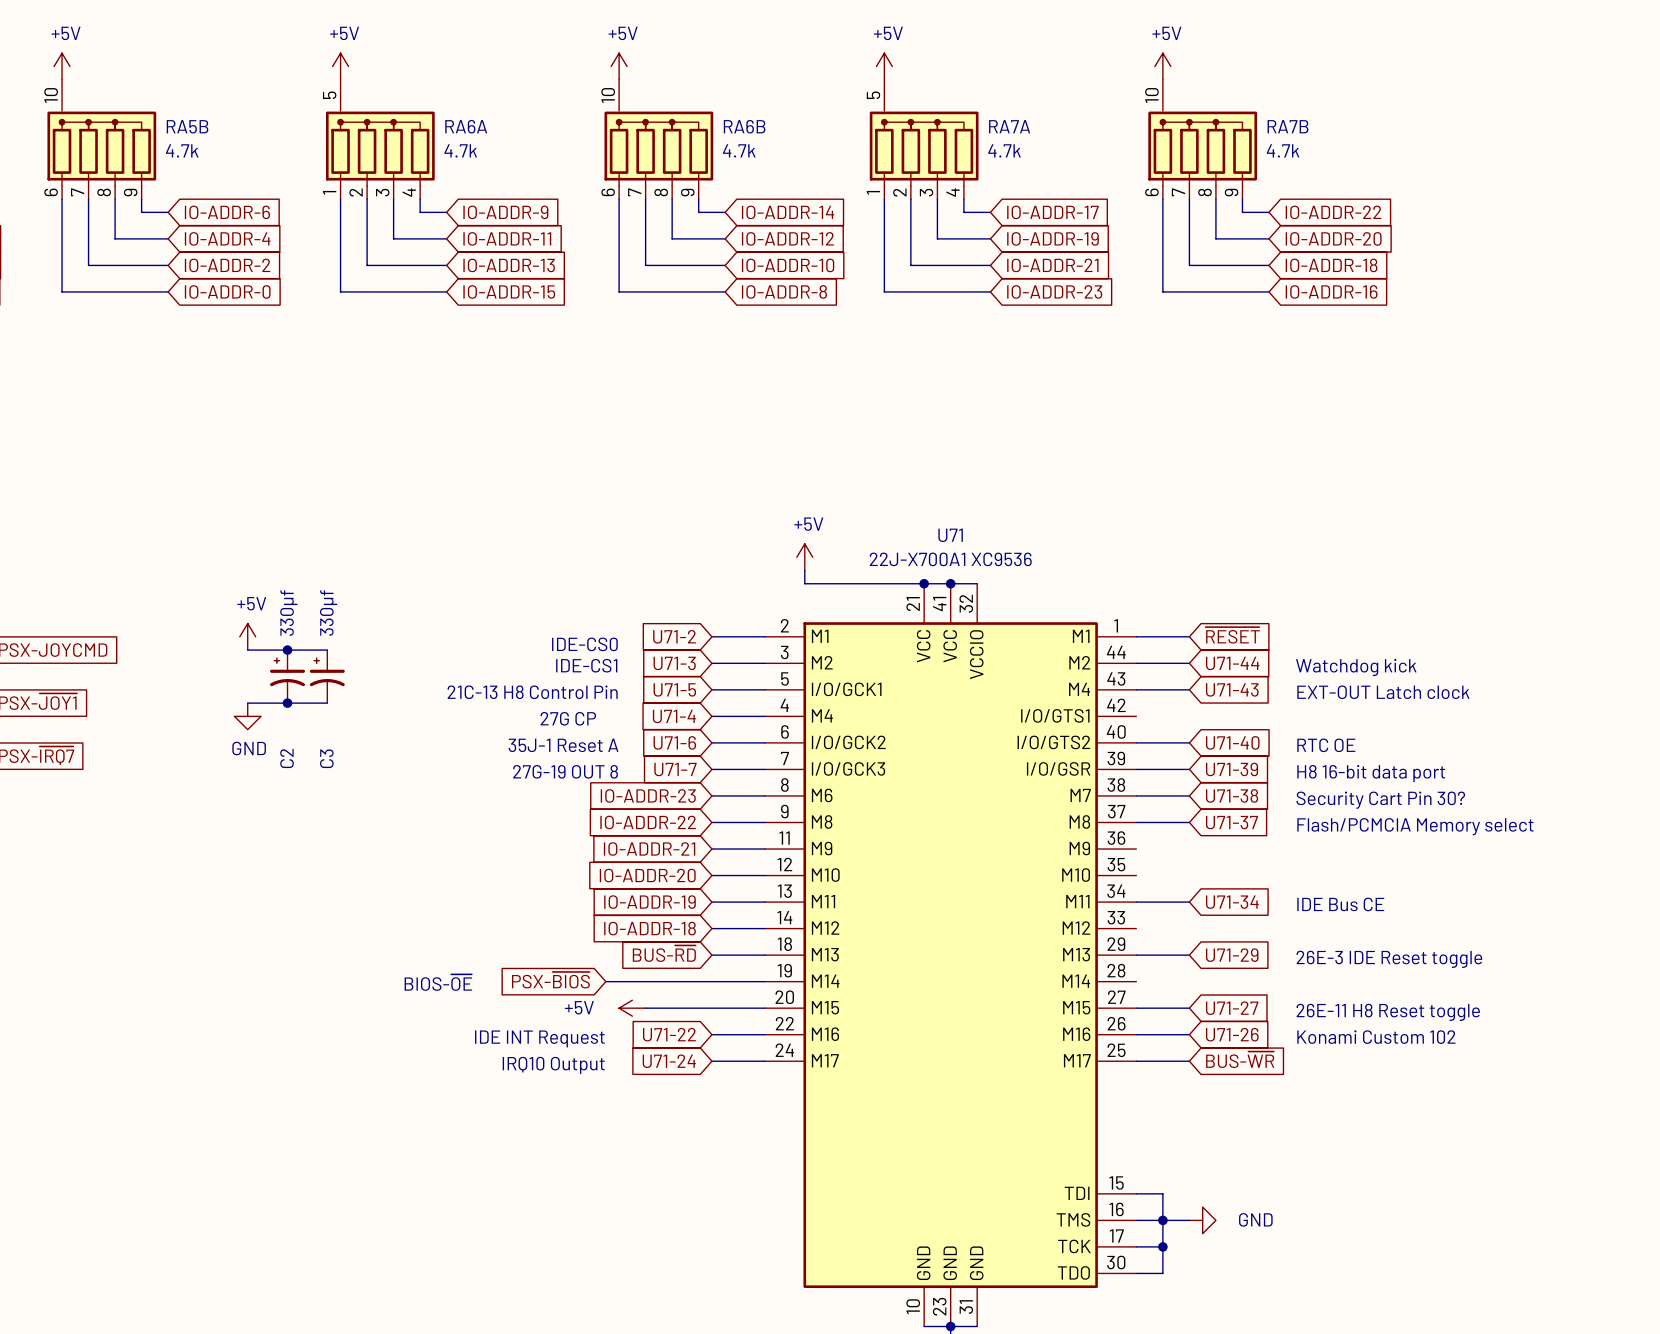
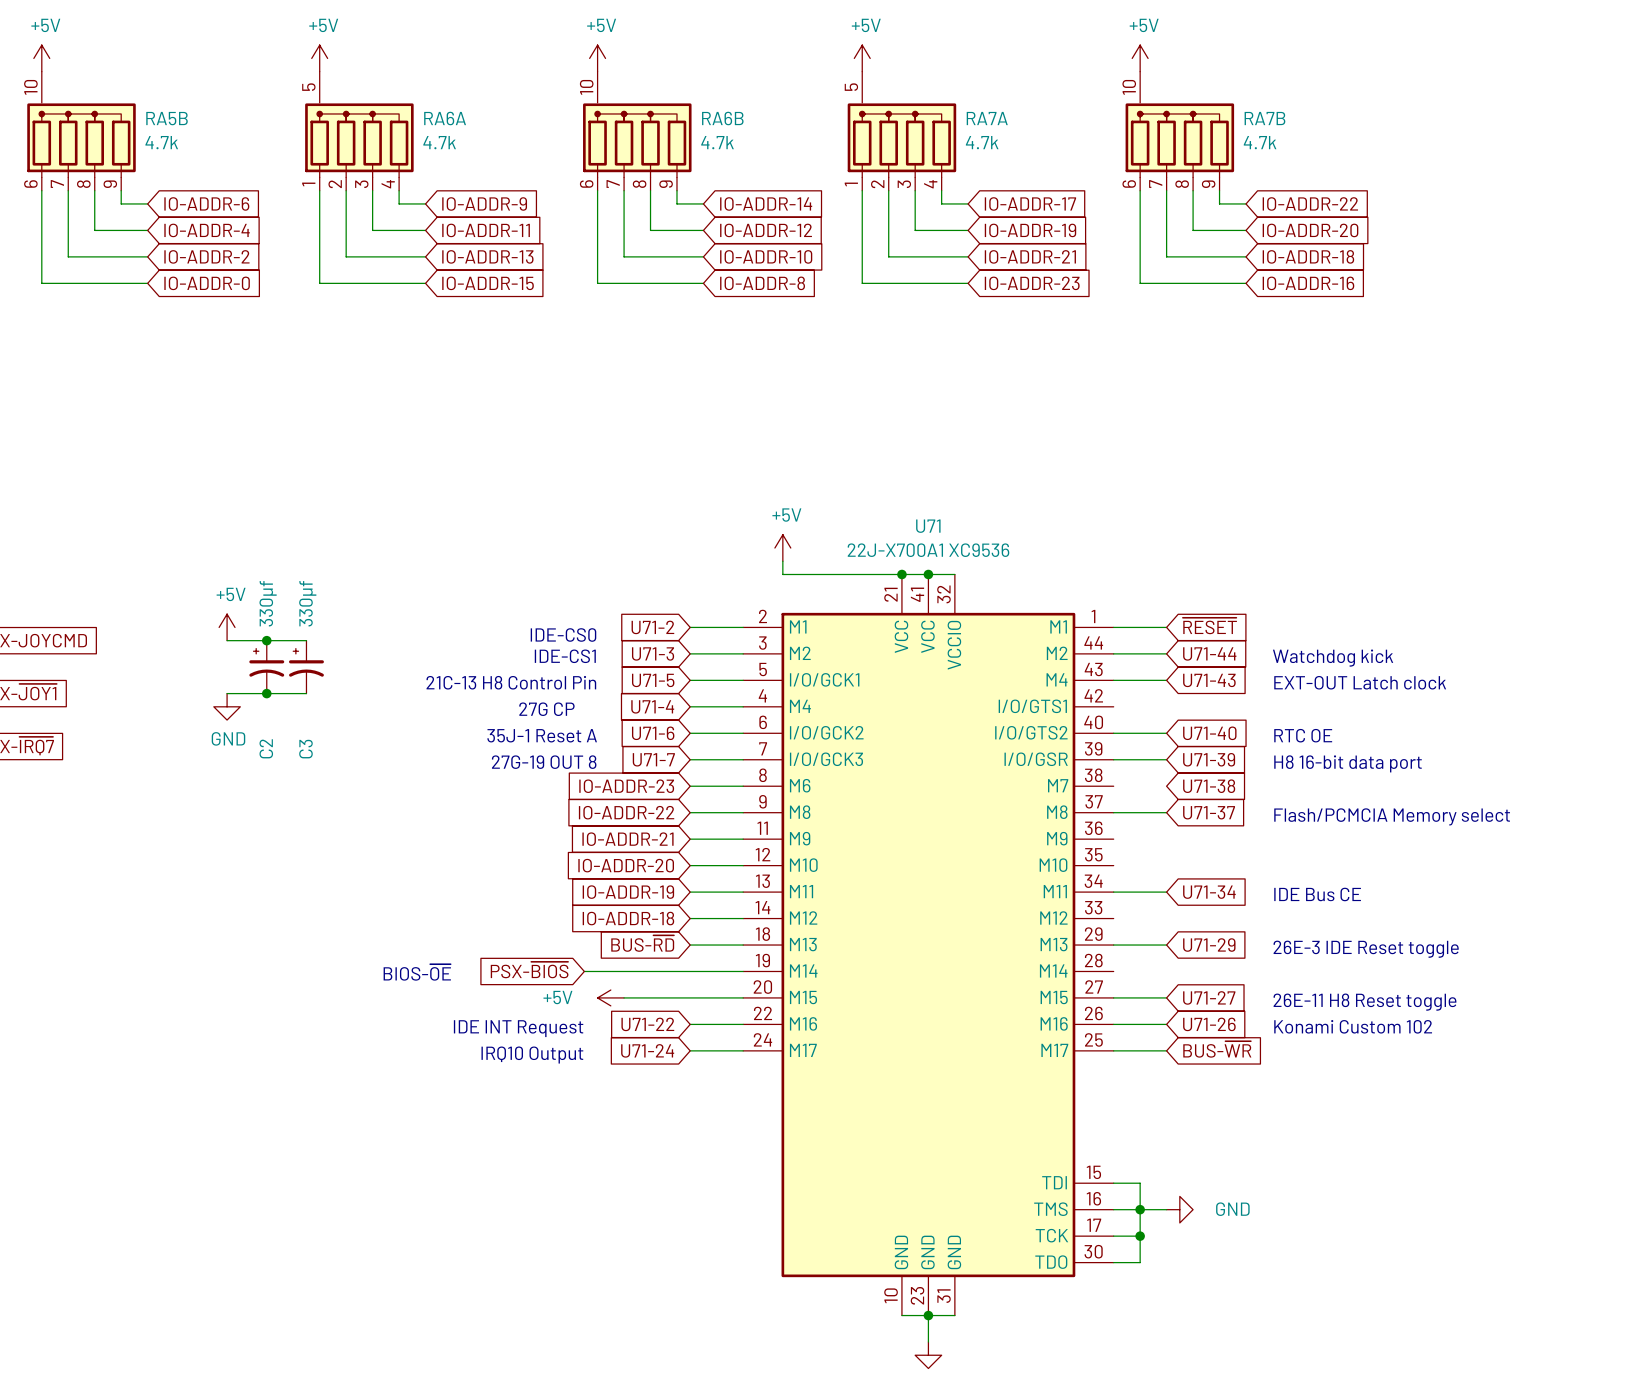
wire: (1136, 795) (1189, 795) -> none
text: Security Cart Pin 30? (1380, 800) -> none

